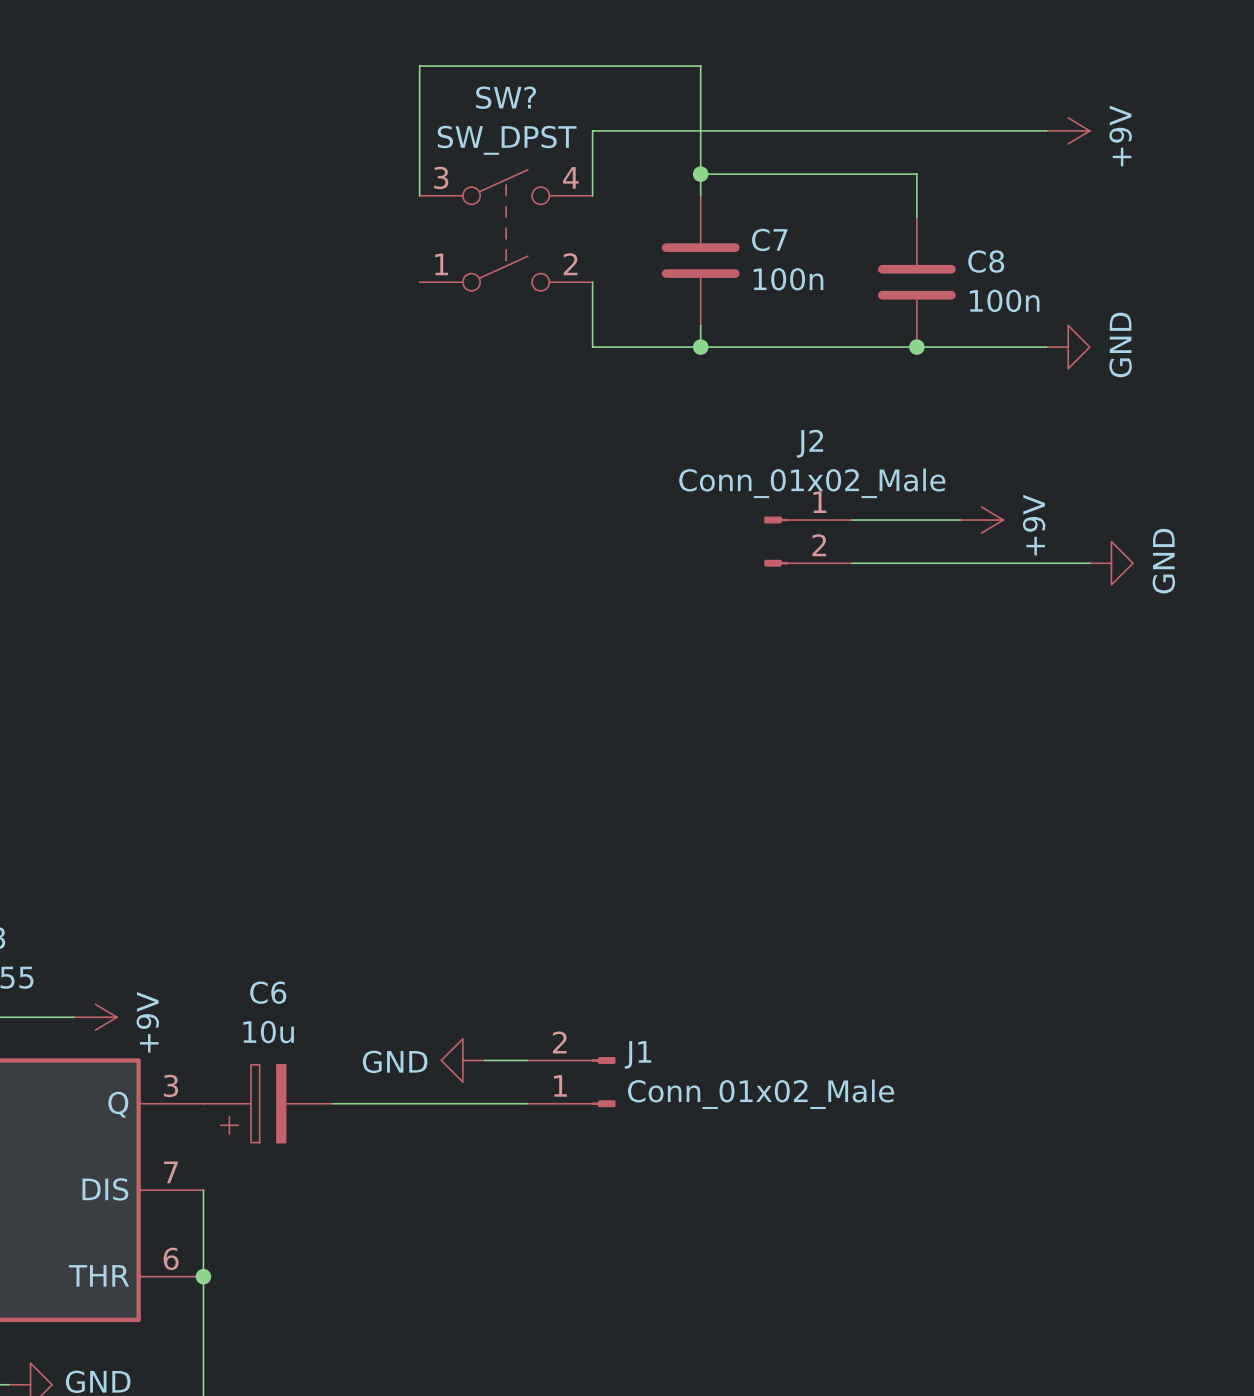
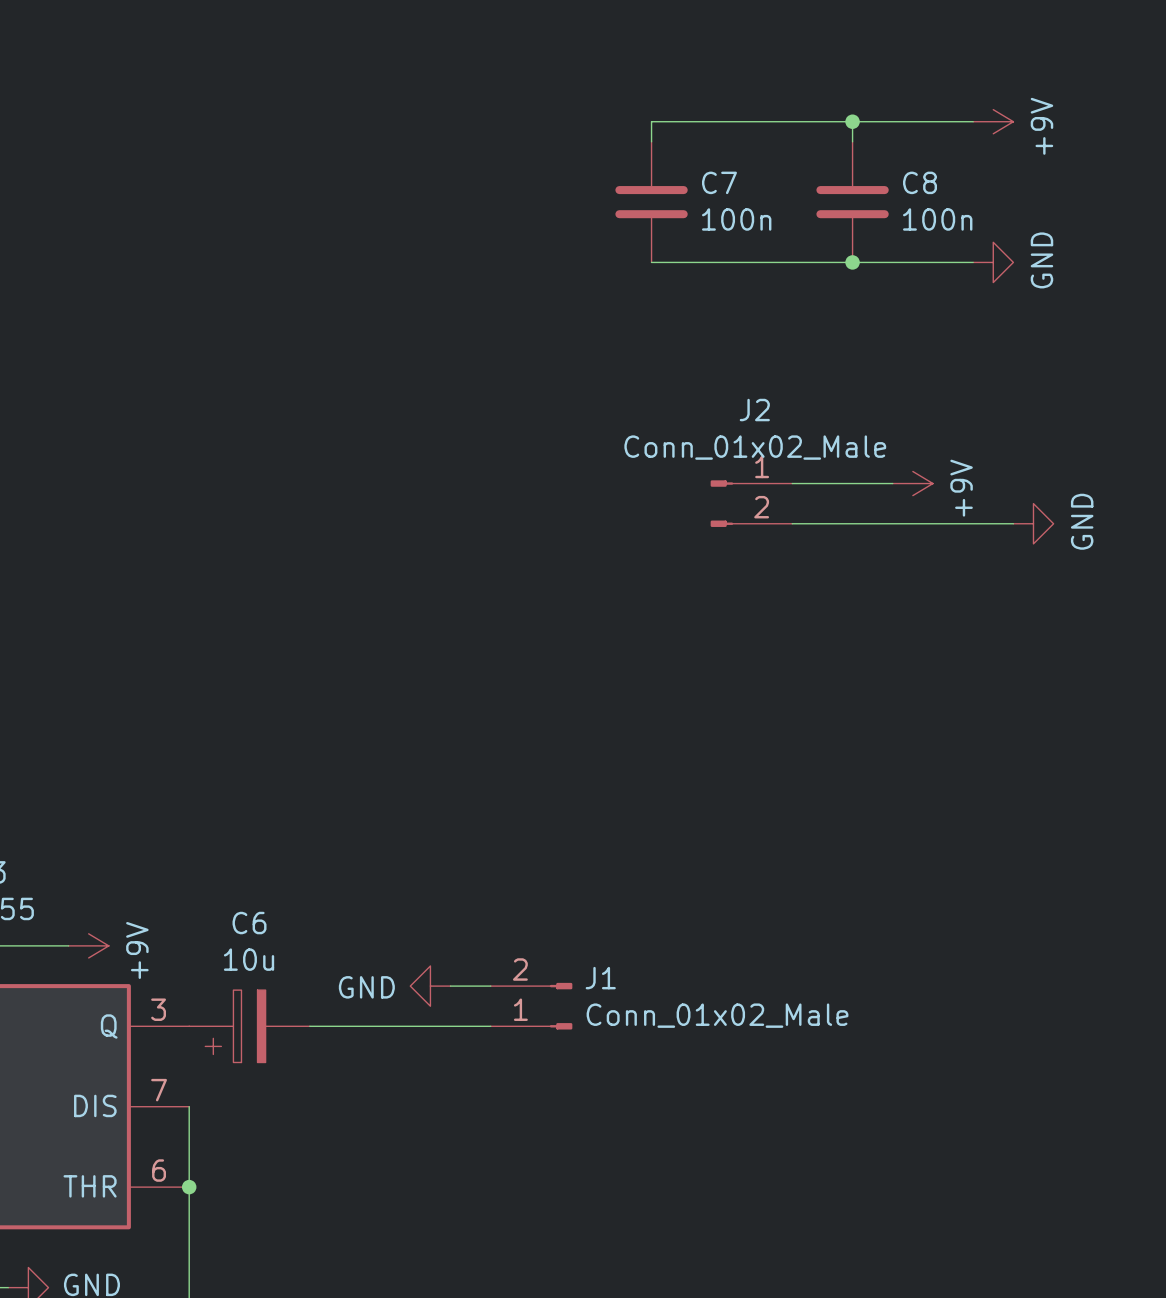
junction: none -> (852, 121)
wire: (700, 174) (916, 174) (916, 217) -> none
junction: (700, 174) -> none
wire: (419, 195) (419, 66) (700, 66) (700, 130) (592, 130) (592, 195) -> none
SW?: SW_DPST (506, 230) -> none
C7 position: (700, 260) -> (651, 202)
wire: (592, 282) (592, 347) (1046, 347) -> none
wire: none -> (651, 262) (973, 262)
C8 position: (916, 282) -> (852, 202)
wire: (700, 325) (700, 347) -> (852, 121) (852, 141)
junction: (700, 347) -> none
junction position: (916, 347) -> (852, 262)
power symbol position: GND (1068, 347) -> GND (993, 262)

